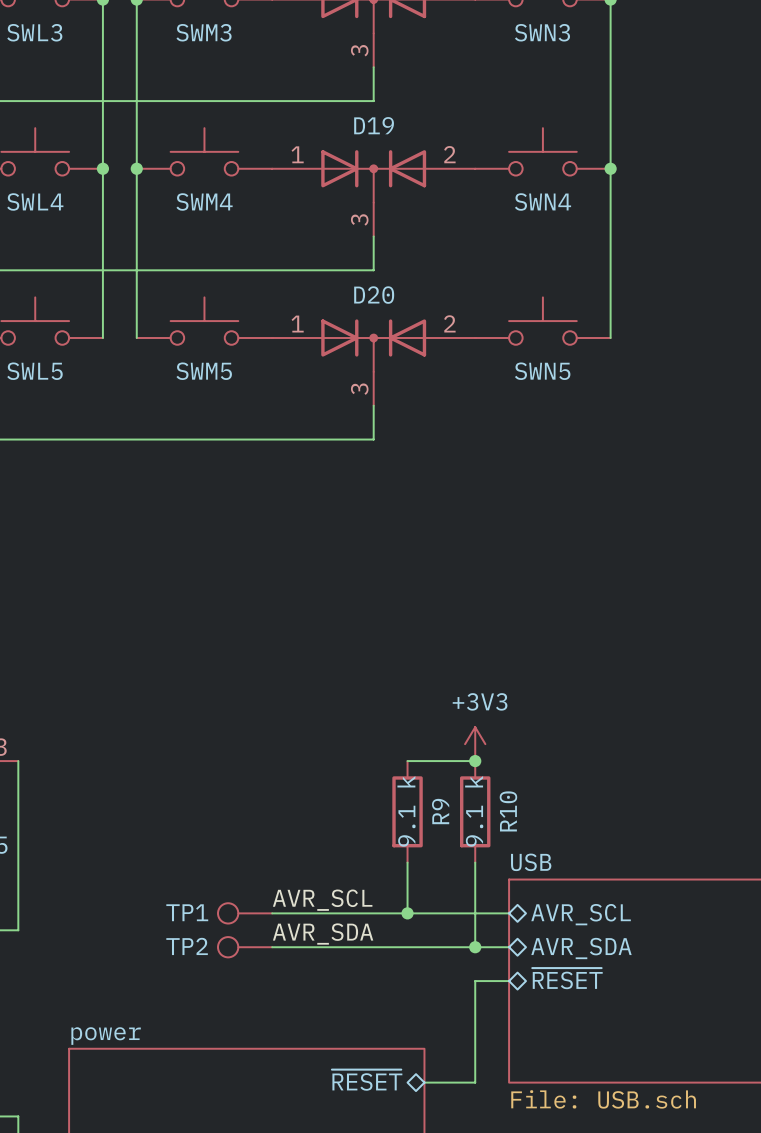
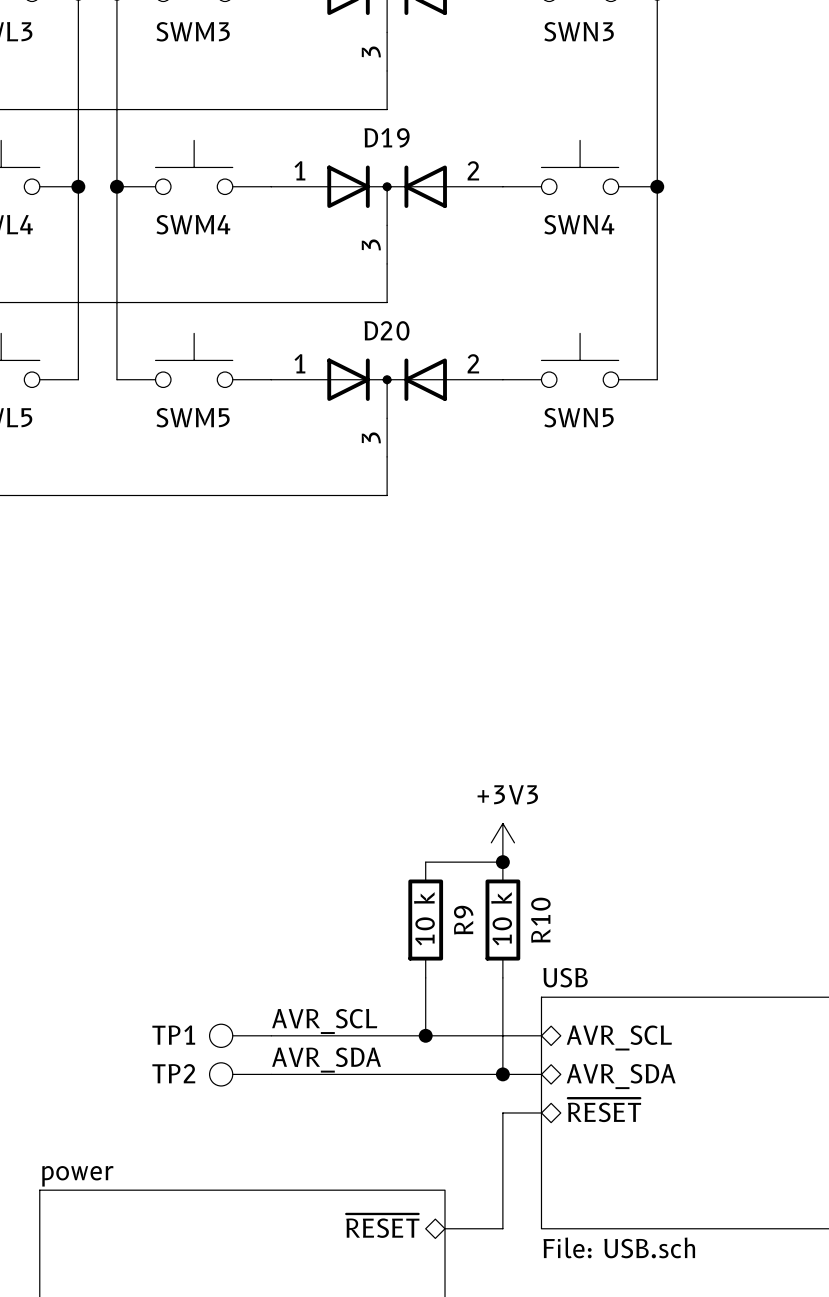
R9 value: 9.1 k (406, 811) -> 10 k (424, 918)
R10 value: 9.1 k (474, 811) -> 10 k (501, 918)

